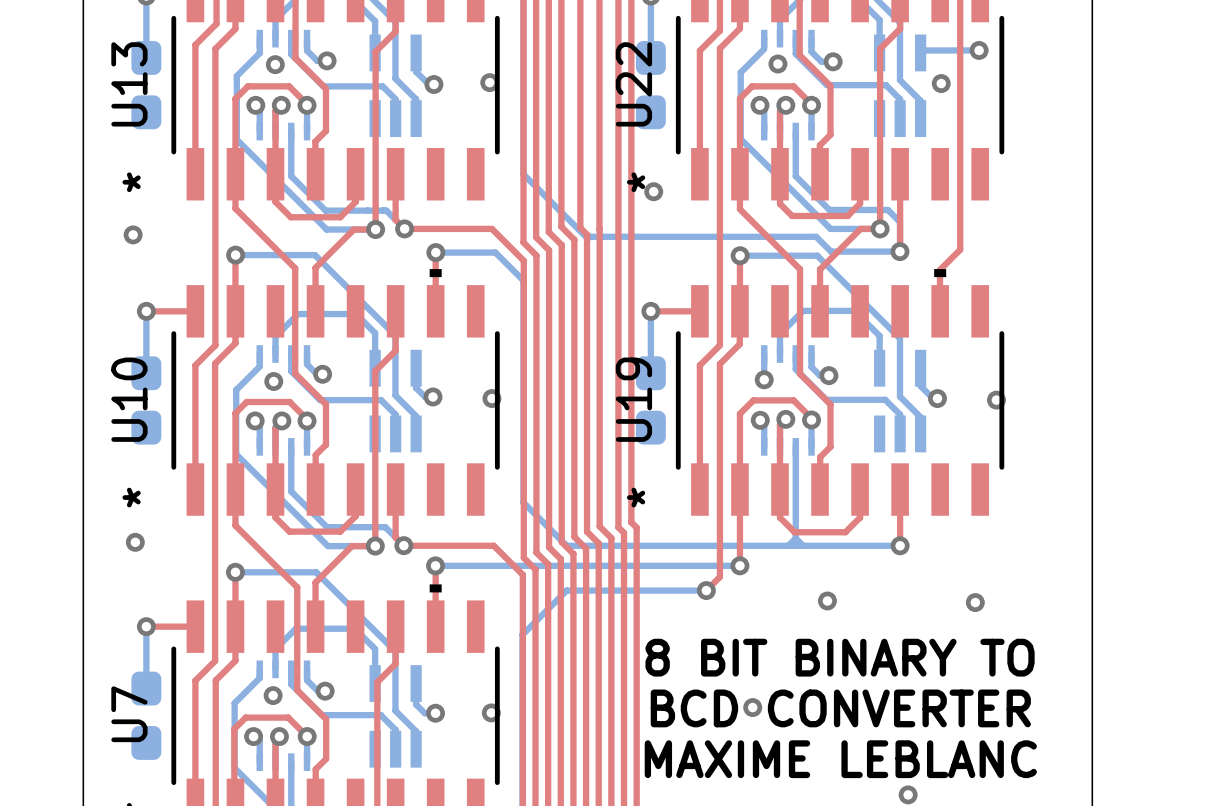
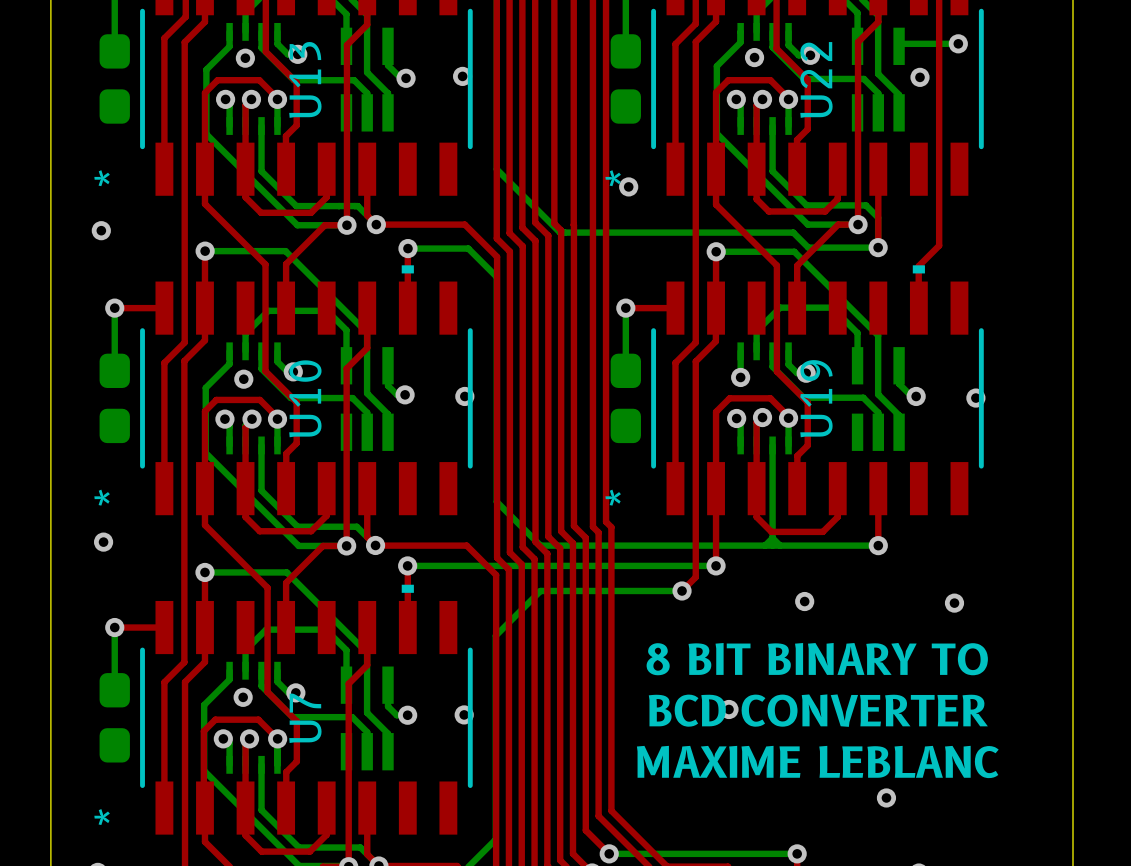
U13 name position: U13 (129, 84) -> U13 (305, 79)
U22 name position: U22 (633, 84) -> U22 (816, 79)
U10 name position: U10 (129, 399) -> U10 (305, 398)
U19 name position: U19 (633, 399) -> U19 (816, 398)
U7 name position: U7 (129, 714) -> U7 (305, 718)

